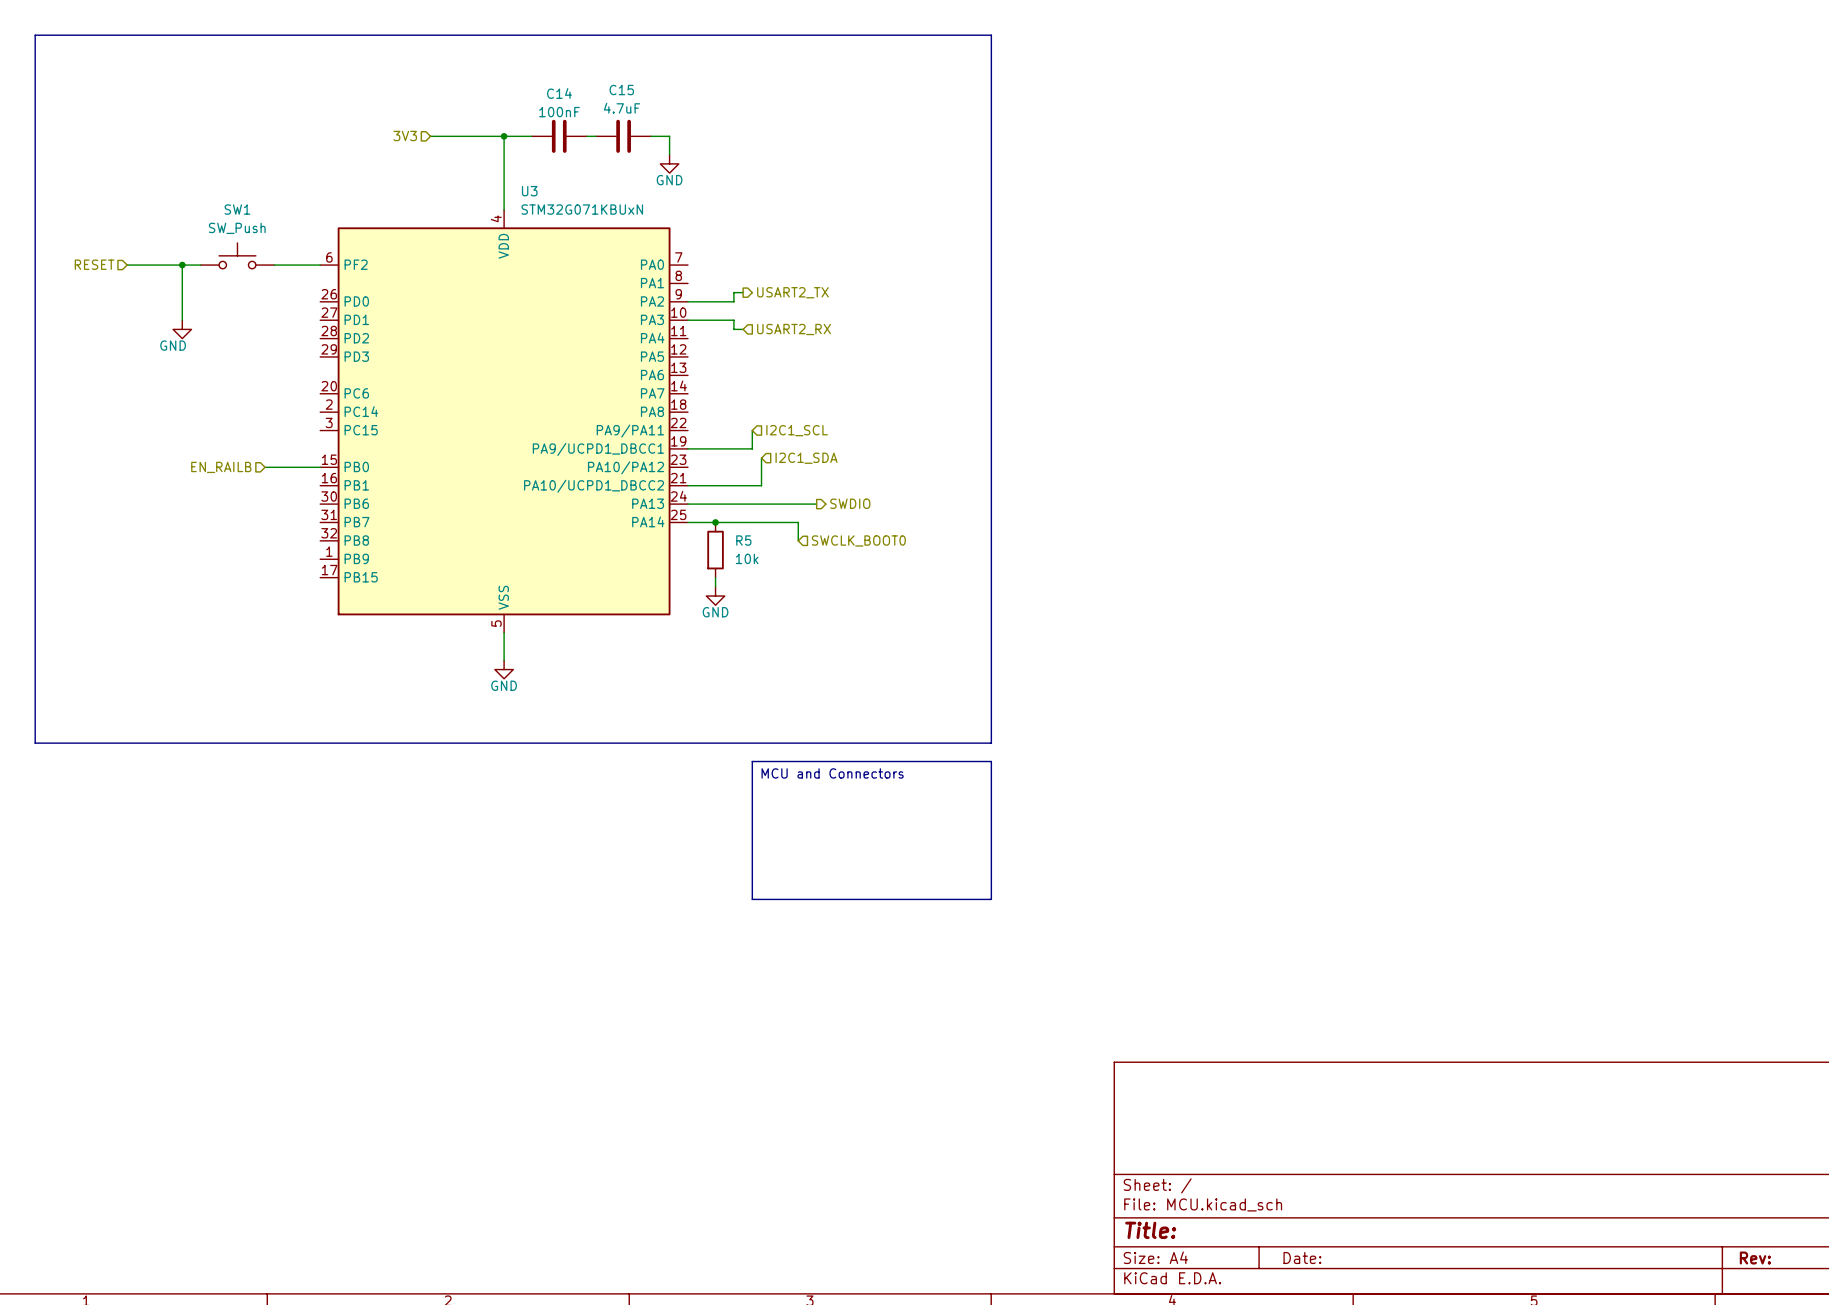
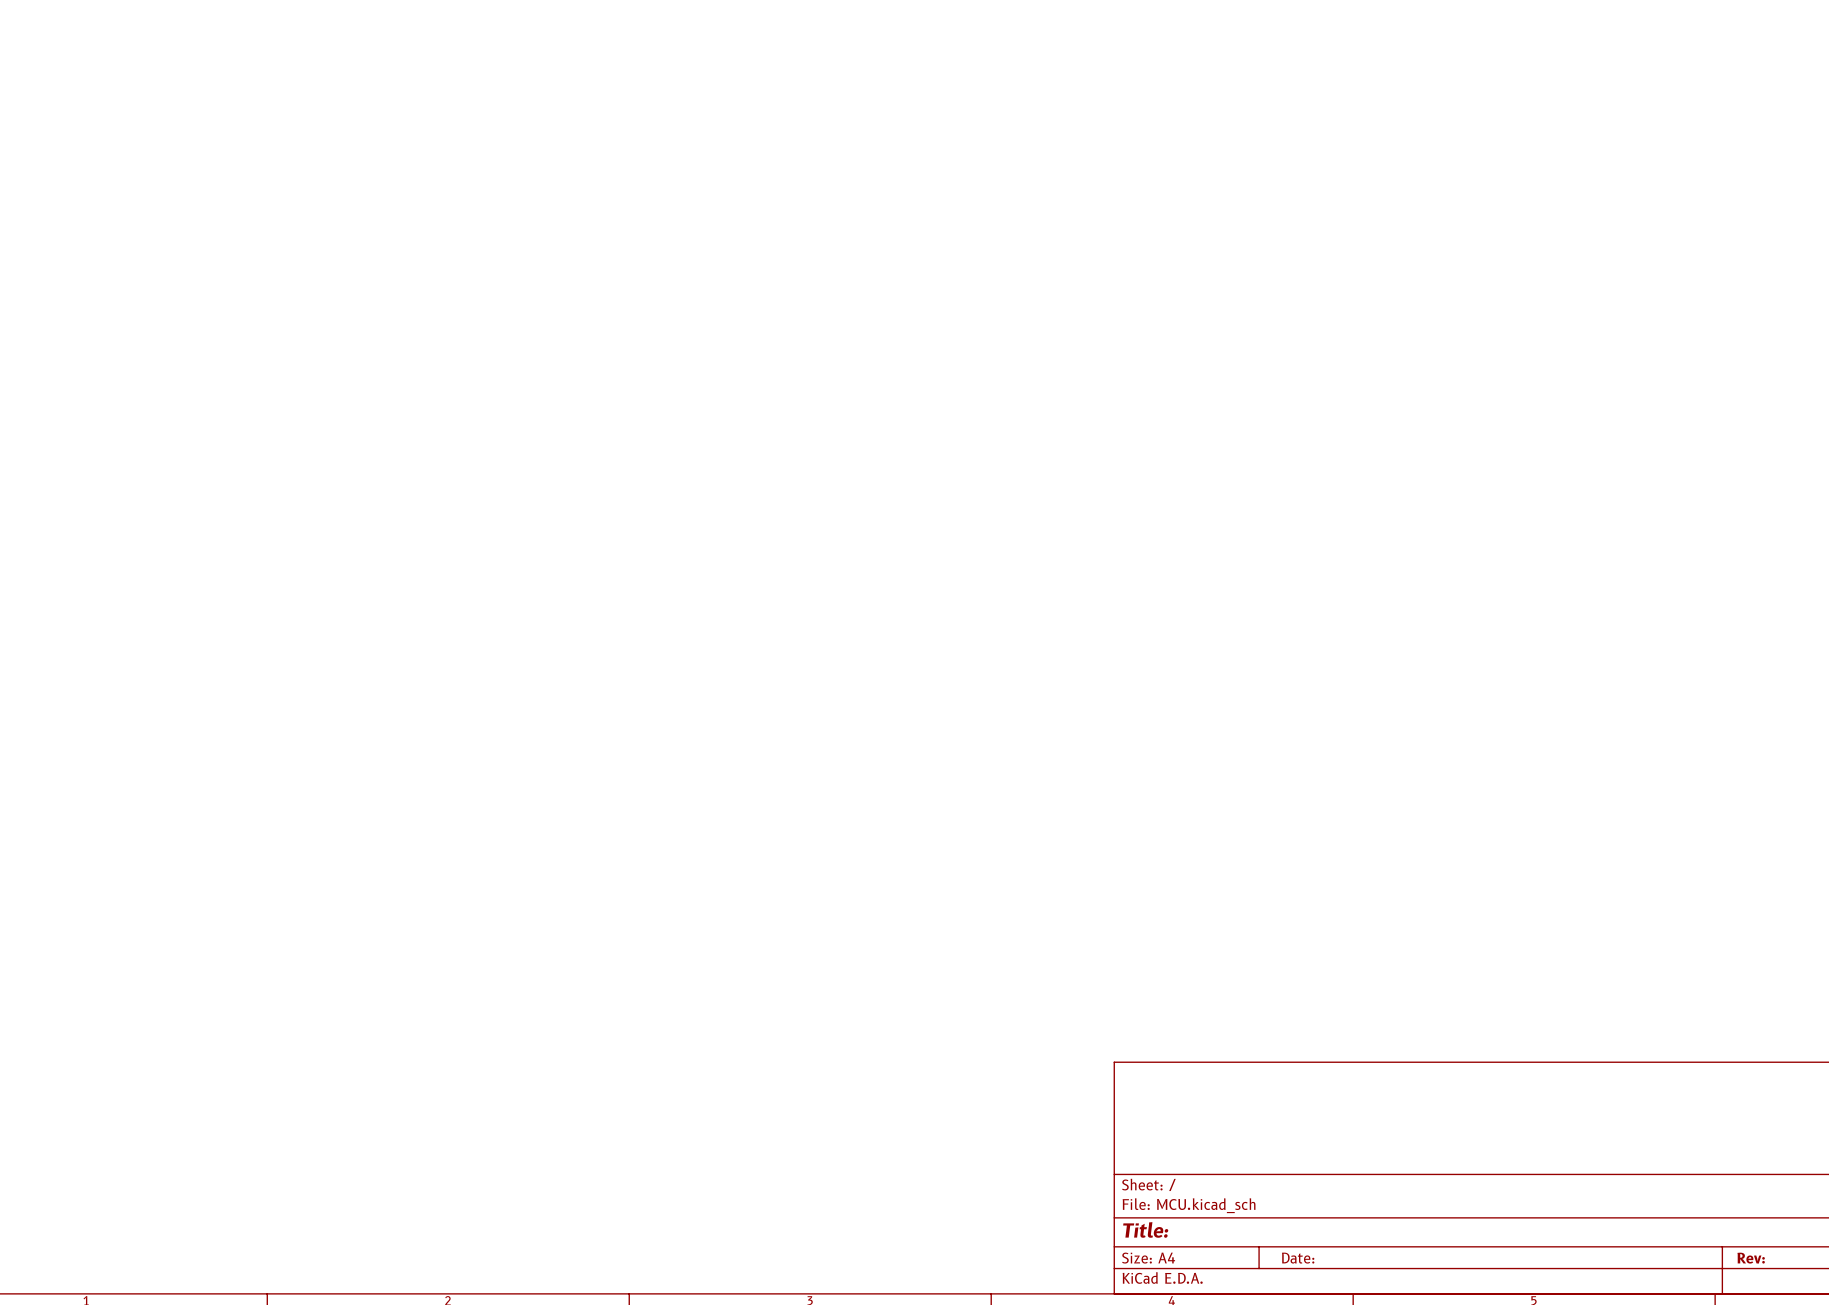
line: (35, 35) (991, 35) (991, 743) (35, 743) (35, 35) -> none
hierarchical label: 3V3 (405, 135) -> none
wire: (430, 136) (531, 136) -> none
wire: (504, 136) (504, 209) -> none
junction: (504, 136) -> none
C14: 100nF (559, 136) -> none
wire: (586, 136) (596, 136) -> none
C15: 4.7uF (623, 136) -> none
wire: (651, 136) (669, 136) (669, 154) -> none
power symbol: GND (669, 163) -> none
SW1: SW_Push (237, 255) -> none
hierarchical label: RESET (94, 264) -> none
wire: (127, 265) (200, 265) -> none
wire: (182, 265) (182, 320) -> none
junction: (182, 265) -> none
wire: (274, 265) (320, 265) -> none
wire: (743, 292) (733, 292) (733, 301) (687, 301) -> none
hierarchical label: USART2_TX (792, 292) -> none
wire: (687, 320) (733, 320) (733, 329) (743, 329) -> none
power symbol: GND (182, 329) -> none
hierarchical label: USART2_RX (794, 329) -> none
U3: STM32G071KBUxN (504, 421) -> none
wire: (752, 430) (752, 448) (687, 448) -> none
hierarchical label: I2C1_SCL (797, 430) -> none
wire: (761, 458) (761, 485) (687, 485) -> none
hierarchical label: I2C1_SDA (806, 458) -> none
hierarchical label: EN_RAILB (221, 467) -> none
wire: (265, 467) (320, 467) -> none
hierarchical label: SWDIO (850, 503) -> none
wire: (687, 504) (816, 504) -> none
wire: (687, 522) (798, 522) (798, 540) -> none
junction: (715, 522) -> none
hierarchical label: SWCLK_BOOT0 (858, 540) -> none
R5: 10k (715, 550) -> none
wire: (715, 577) (715, 586) -> none
power symbol: GND (715, 596) -> none
wire: (504, 632) (504, 660) -> none
power symbol: GND (504, 669) -> none
line: (752, 761) (991, 761) (991, 899) (752, 899) (752, 761) -> none
text: MCU and Connectors (832, 773) -> none

